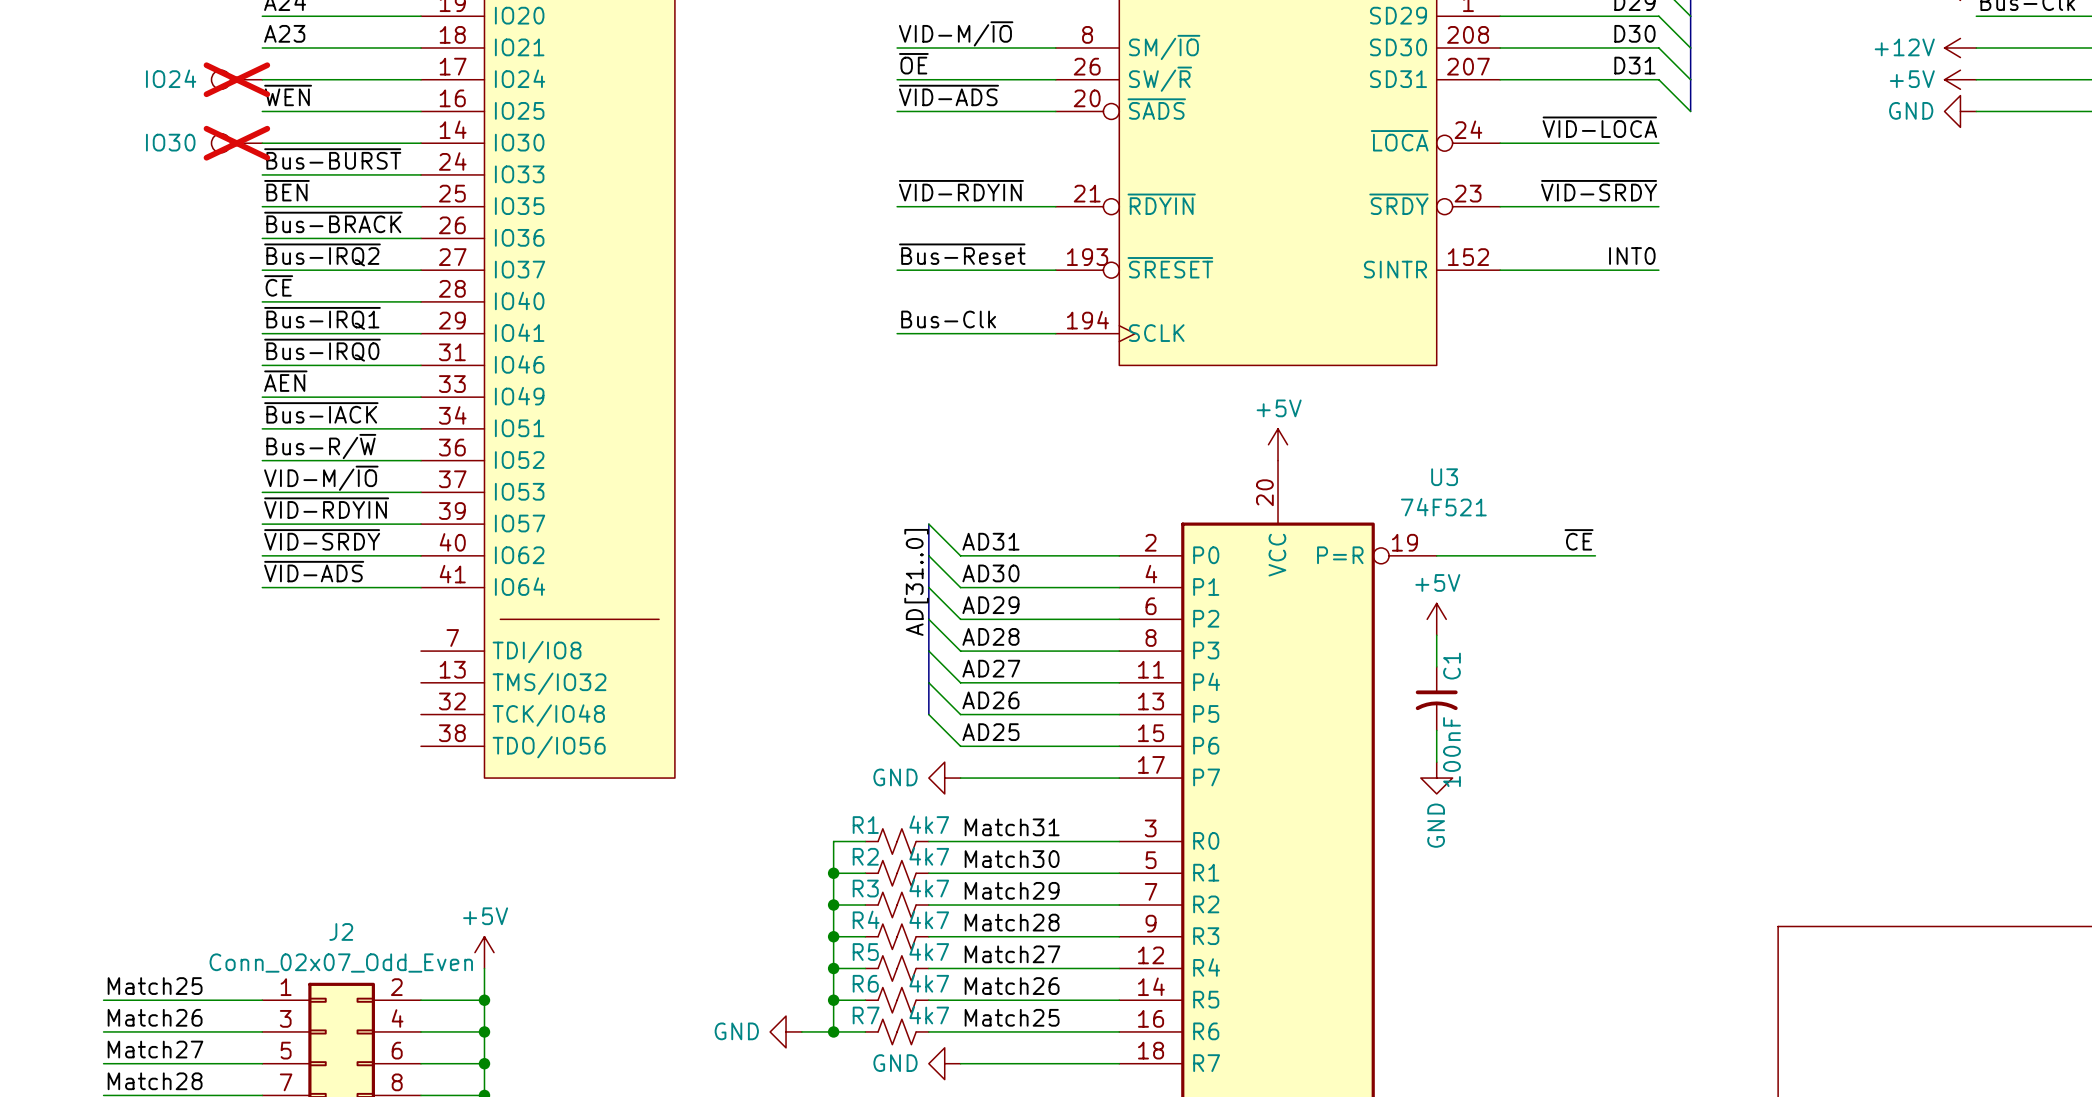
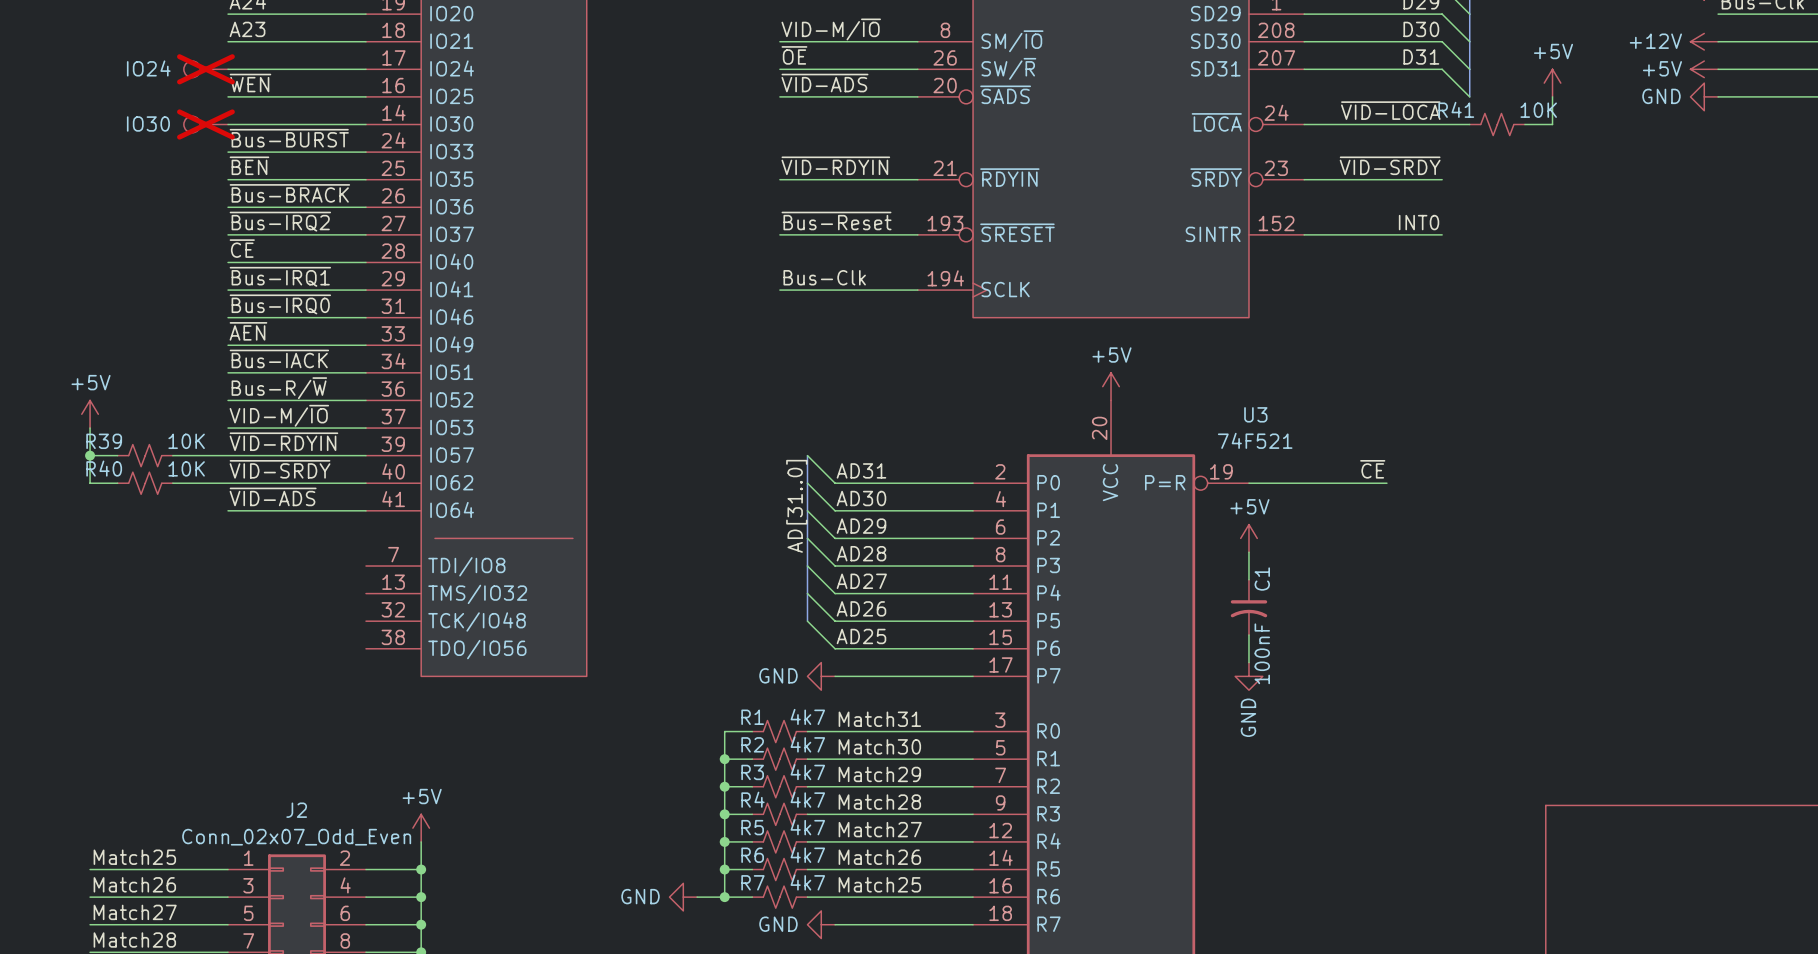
power symbol: none -> +5V (1552, 83)
wire: none -> (1552, 96) (1552, 124) (1524, 124)
wire: none -> (1442, 124) (1469, 124)
R41: none -> 10K (1497, 124)
power symbol: none -> +5V (90, 414)
wire: none -> (90, 428) (90, 483) (117, 483)
wire: none -> (90, 455) (117, 455)
junction: none -> (90, 455)
R39: none -> 10K (145, 455)
wire: none -> (172, 455) (228, 455)
R40: none -> 10K (145, 483)
wire: none -> (172, 483) (228, 483)

